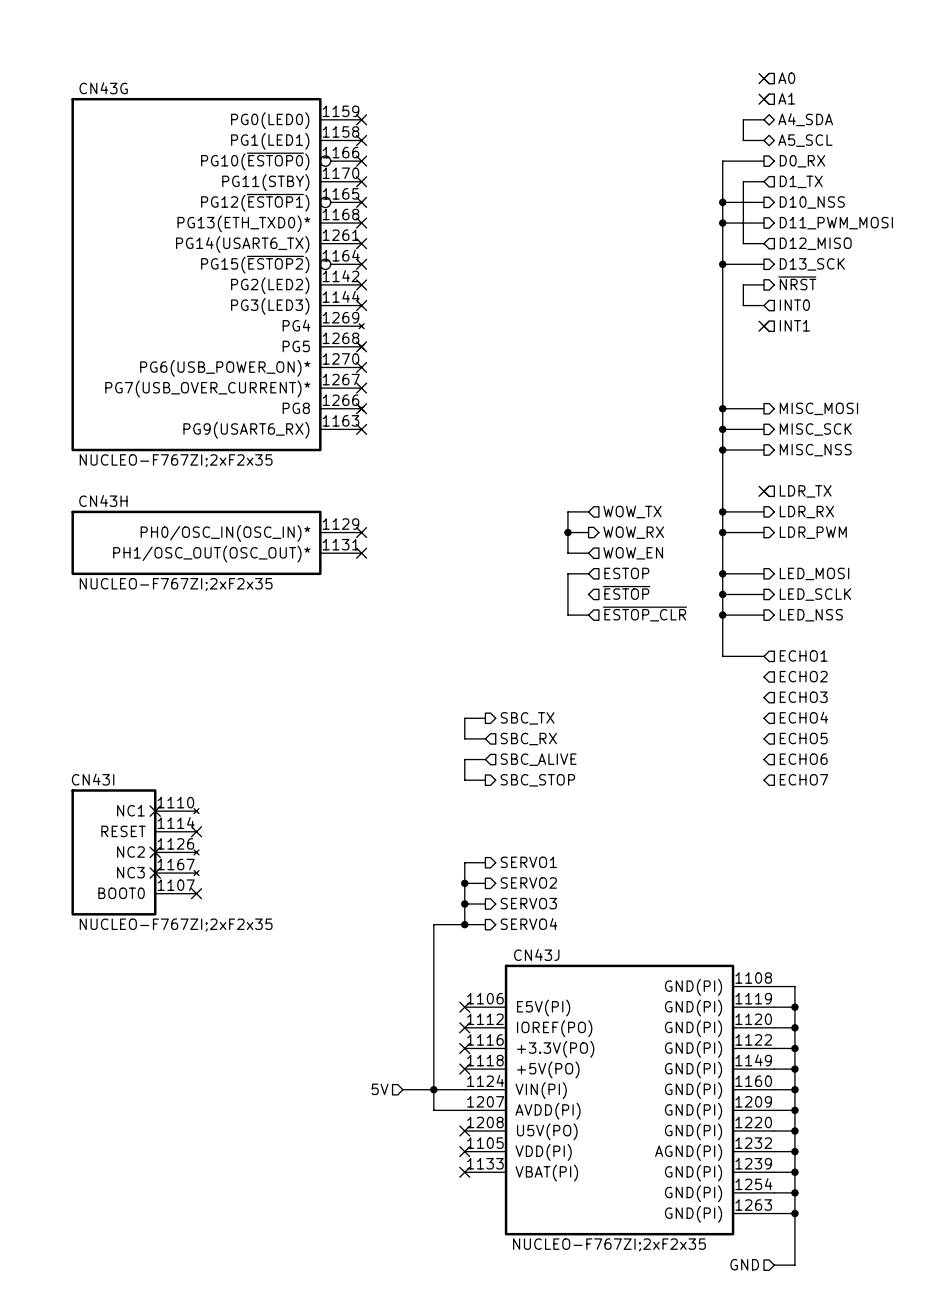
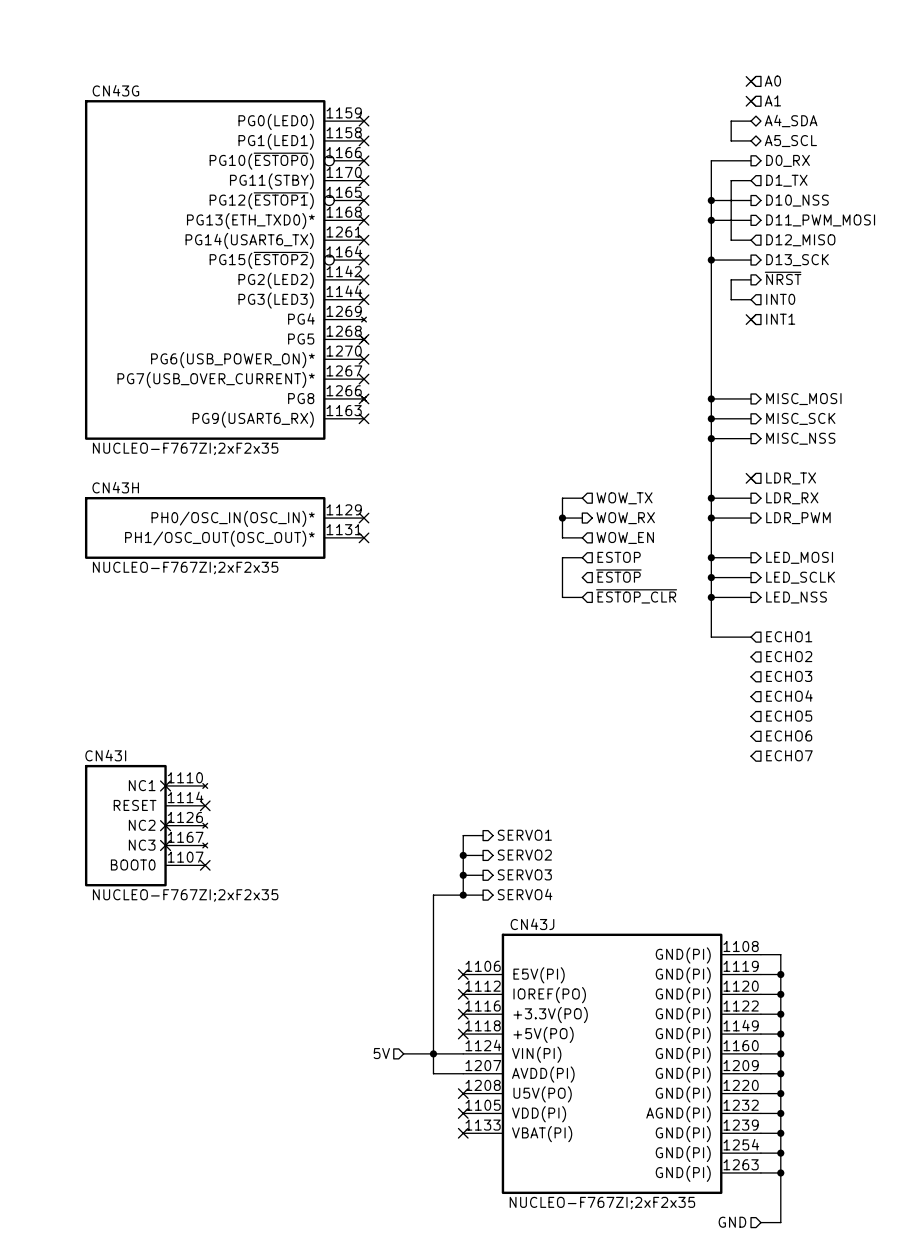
wire: (485, 718) (464, 718) (464, 738) (485, 738) -> none
hierarchical label: SBC_TX (527, 718) -> none
hierarchical label: SBC_RX (528, 739) -> none
wire: (485, 759) (464, 759) (464, 780) (485, 780) -> none
hierarchical label: SBC_ALIVE (538, 759) -> none
hierarchical label: SBC_STOP (537, 780) -> none

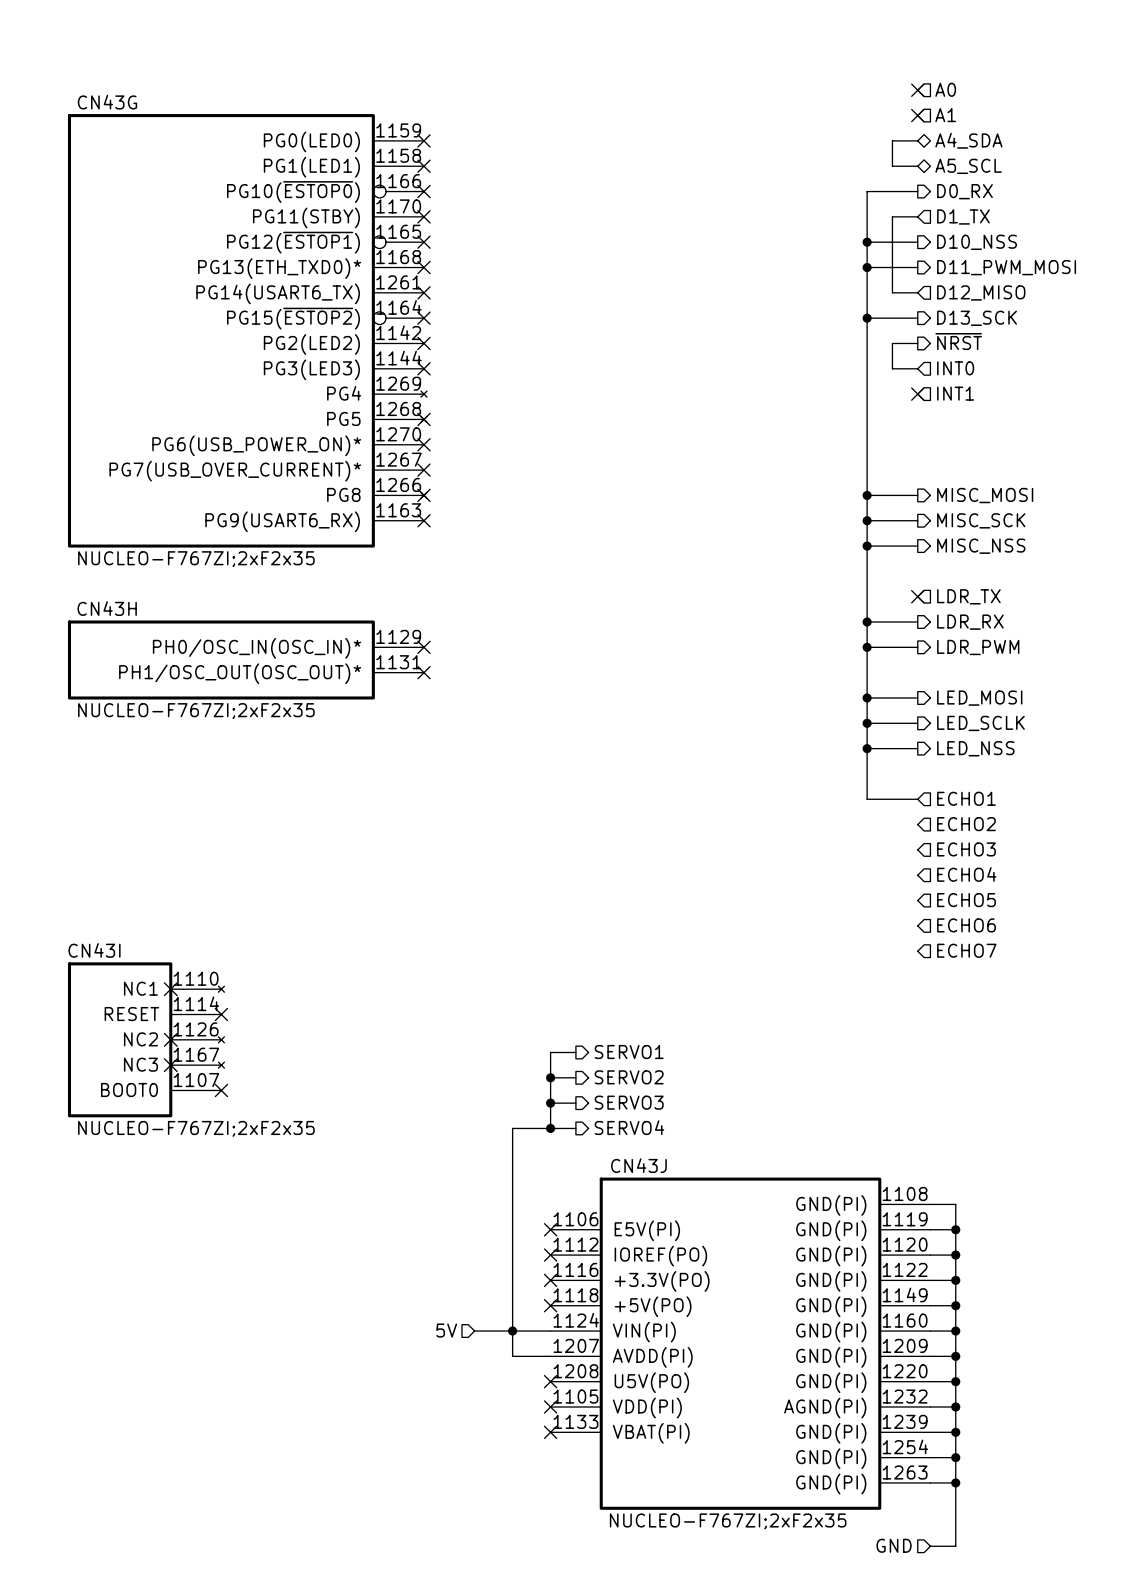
wire: (582, 498) (562, 498) (562, 537) (582, 537) -> none
hierarchical label: WOW_TX (624, 498) -> none
wire: (562, 518) (582, 518) -> none
junction: (562, 518) -> none
hierarchical label: WOW_RX (625, 518) -> none
hierarchical label: WOW_EN (625, 537) -> none
wire: (582, 557) (562, 557) (562, 597) (582, 597) -> none
hierarchical label: ESTOP (619, 557) -> none
hierarchical label: ~{ESTOP} (618, 576) -> none
hierarchical label: ~{ESTOP_CLR} (636, 596) -> none

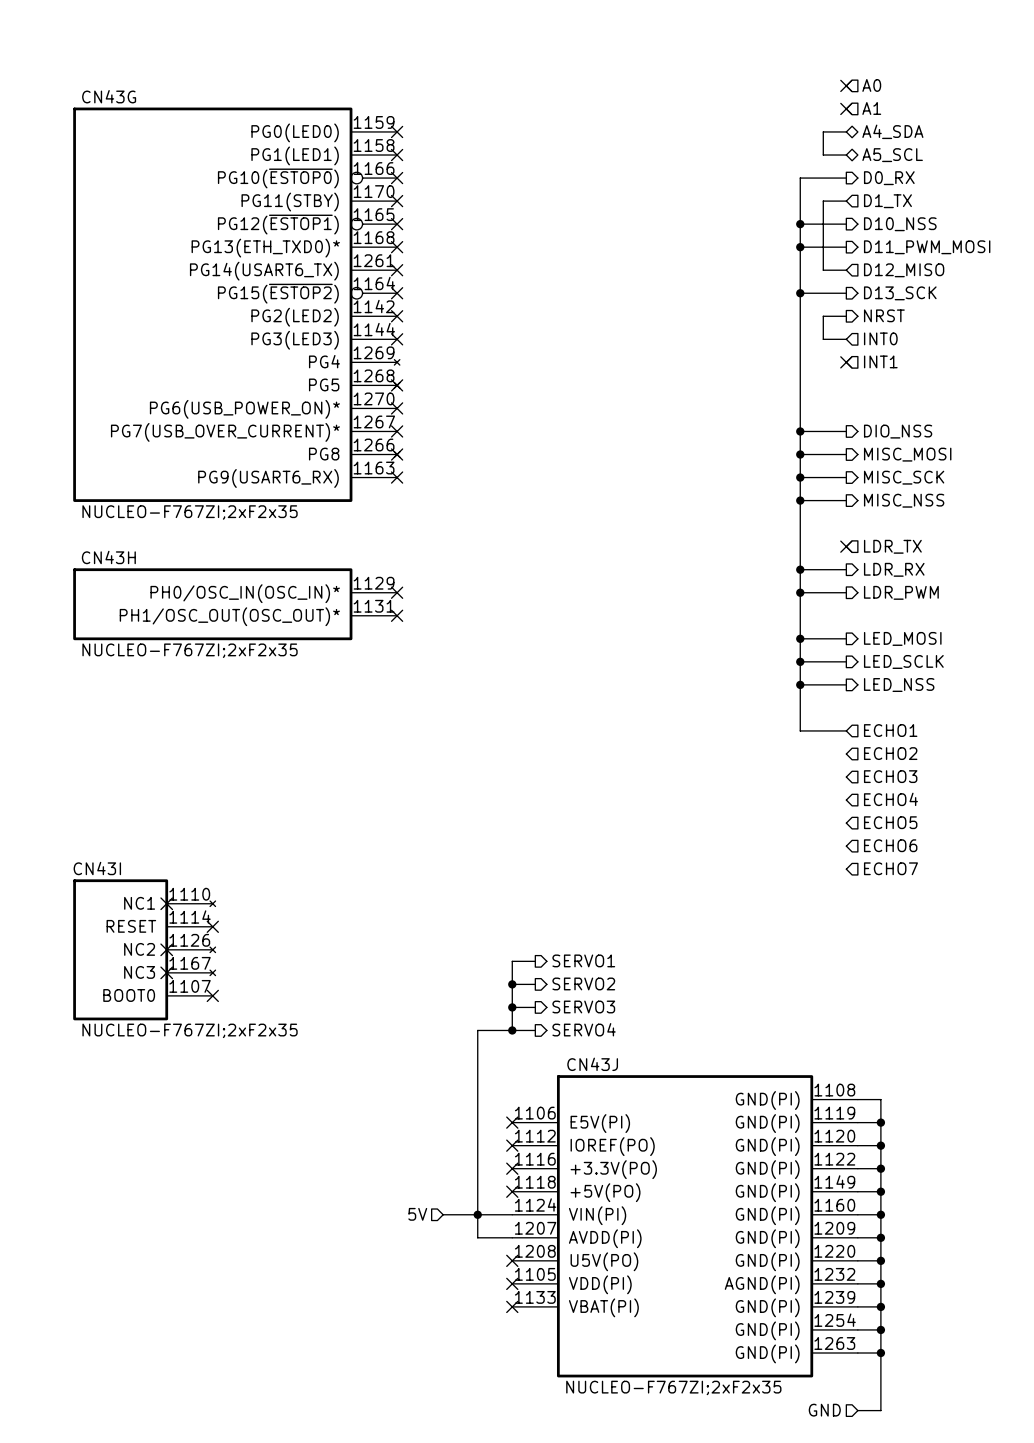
hierarchical label: ~{NRST} (958, 341) -> NRST (884, 315)
wire: none -> (800, 431) (846, 431)
junction: none -> (800, 431)
hierarchical label: none -> DIO_NSS (898, 431)

